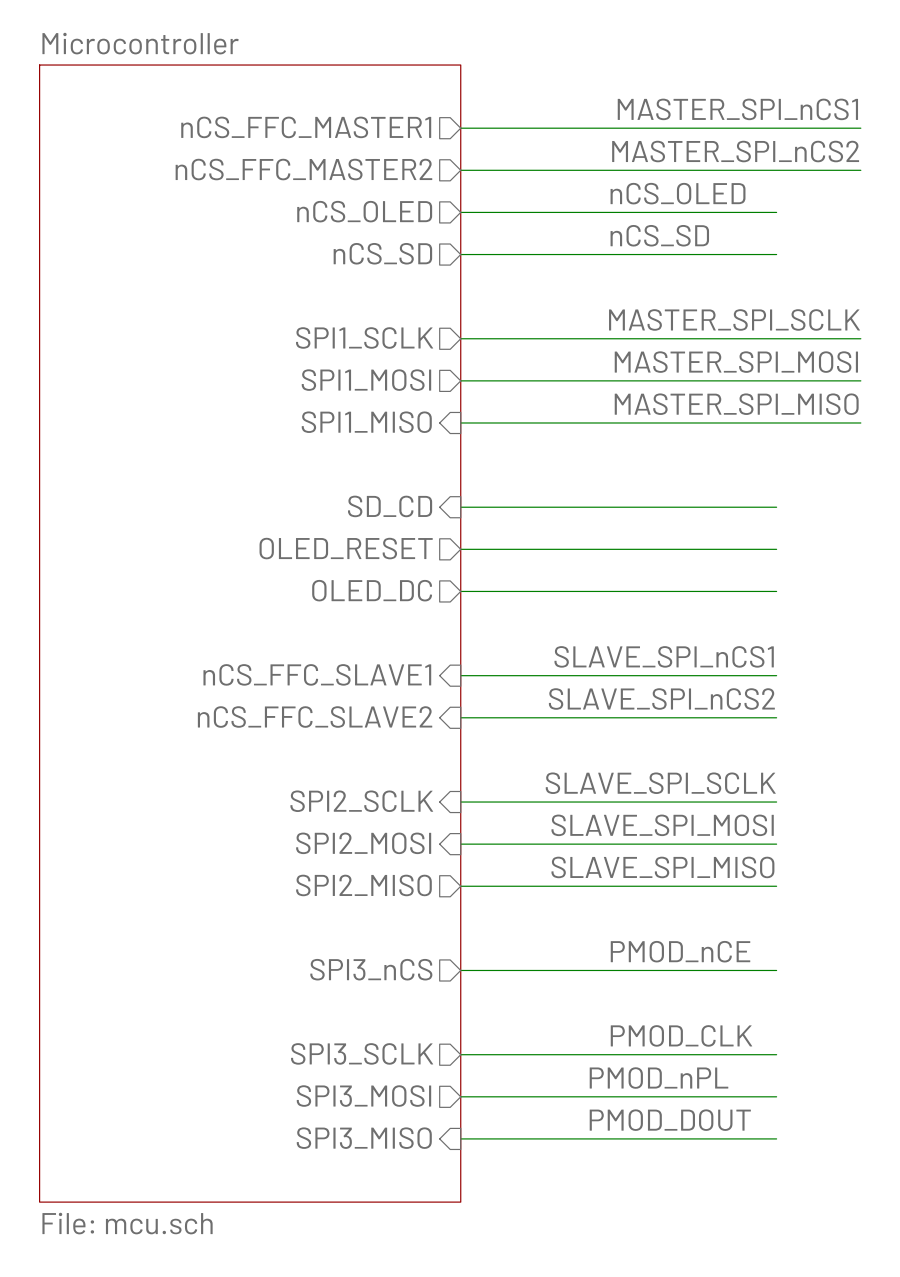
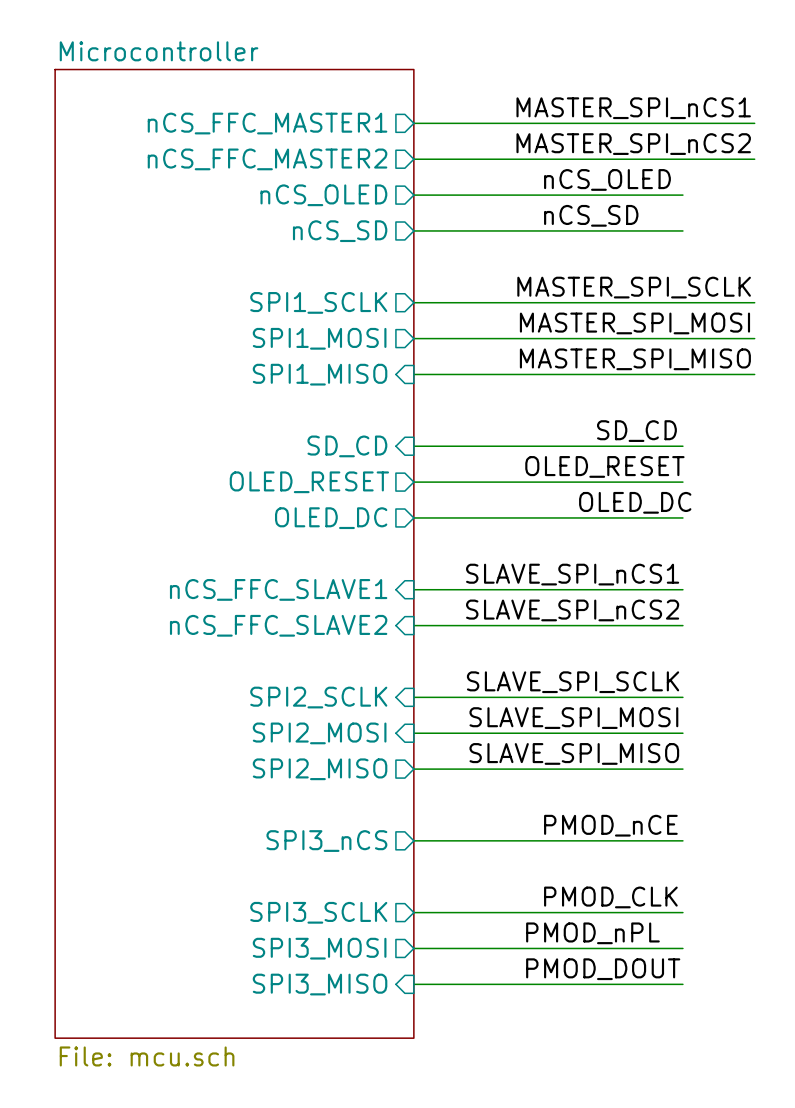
label: none -> SD_CD (636, 431)
label: none -> OLED_RESET (604, 466)
label: none -> OLED_DC (635, 502)

